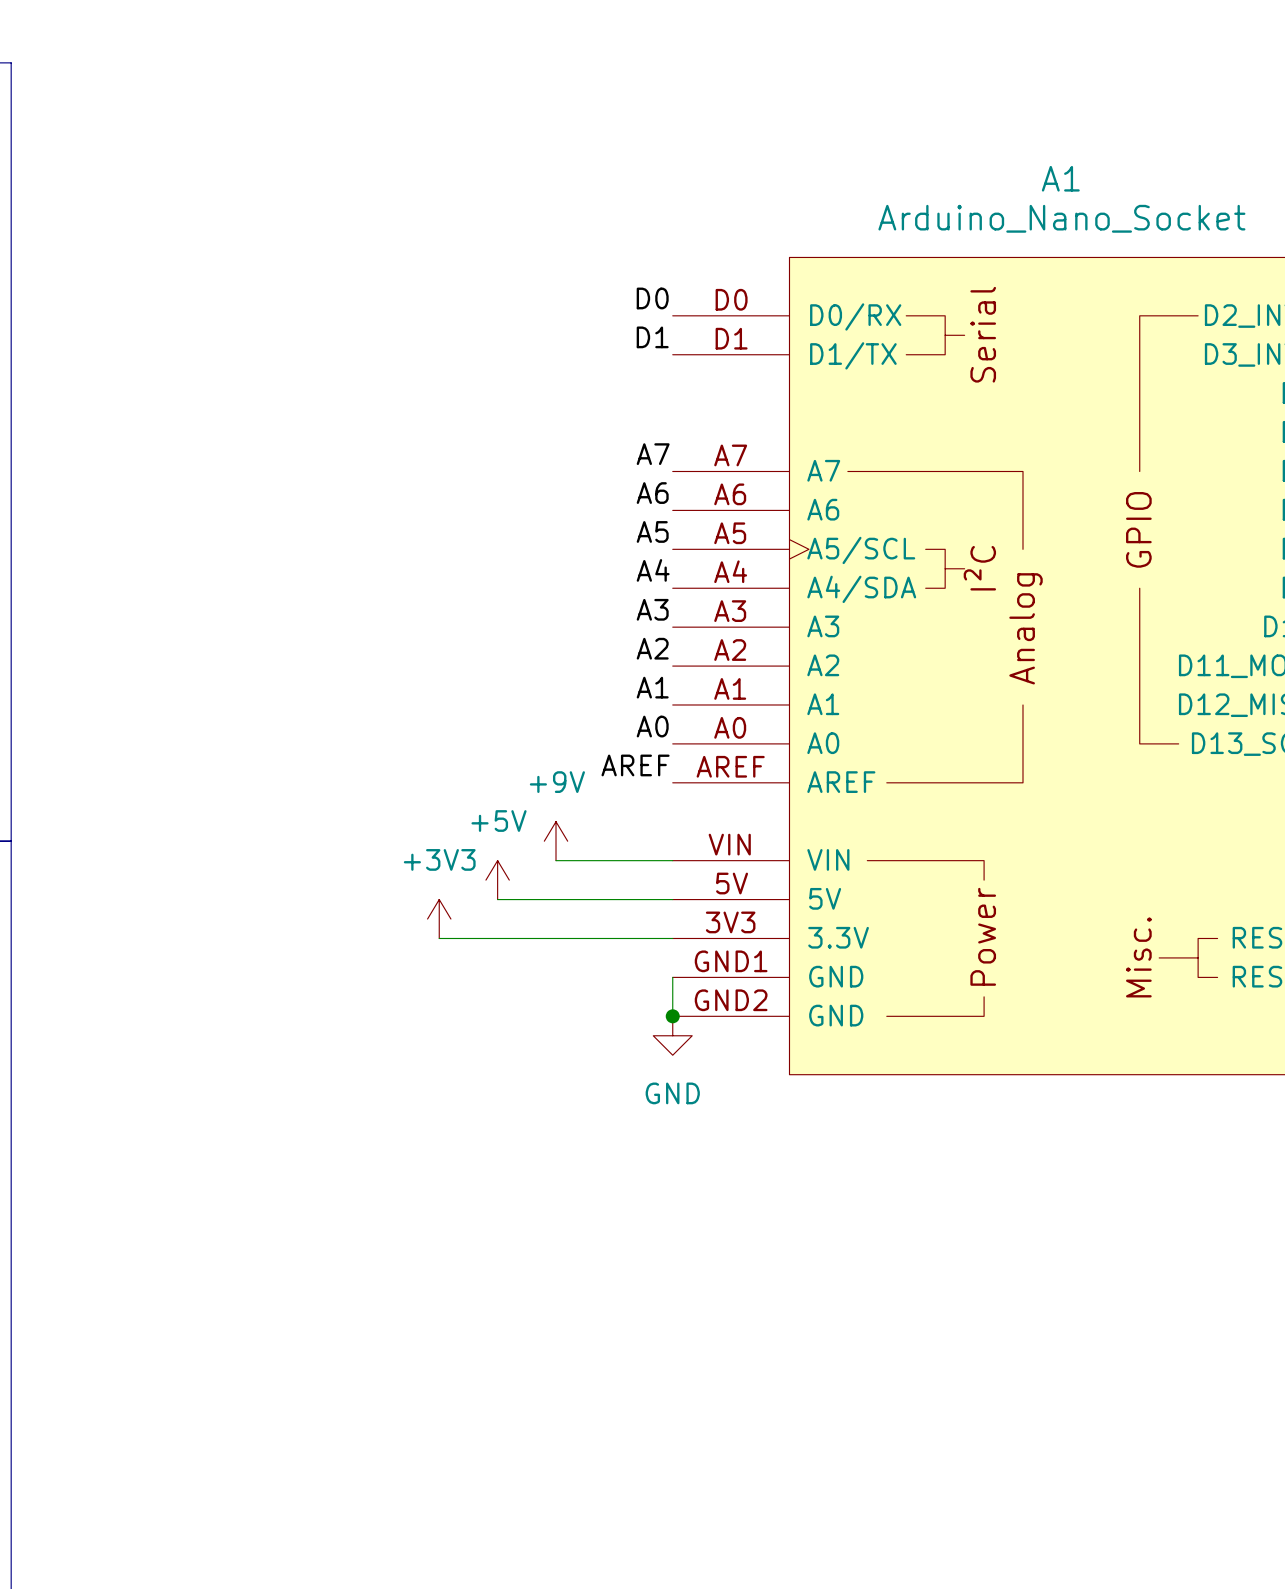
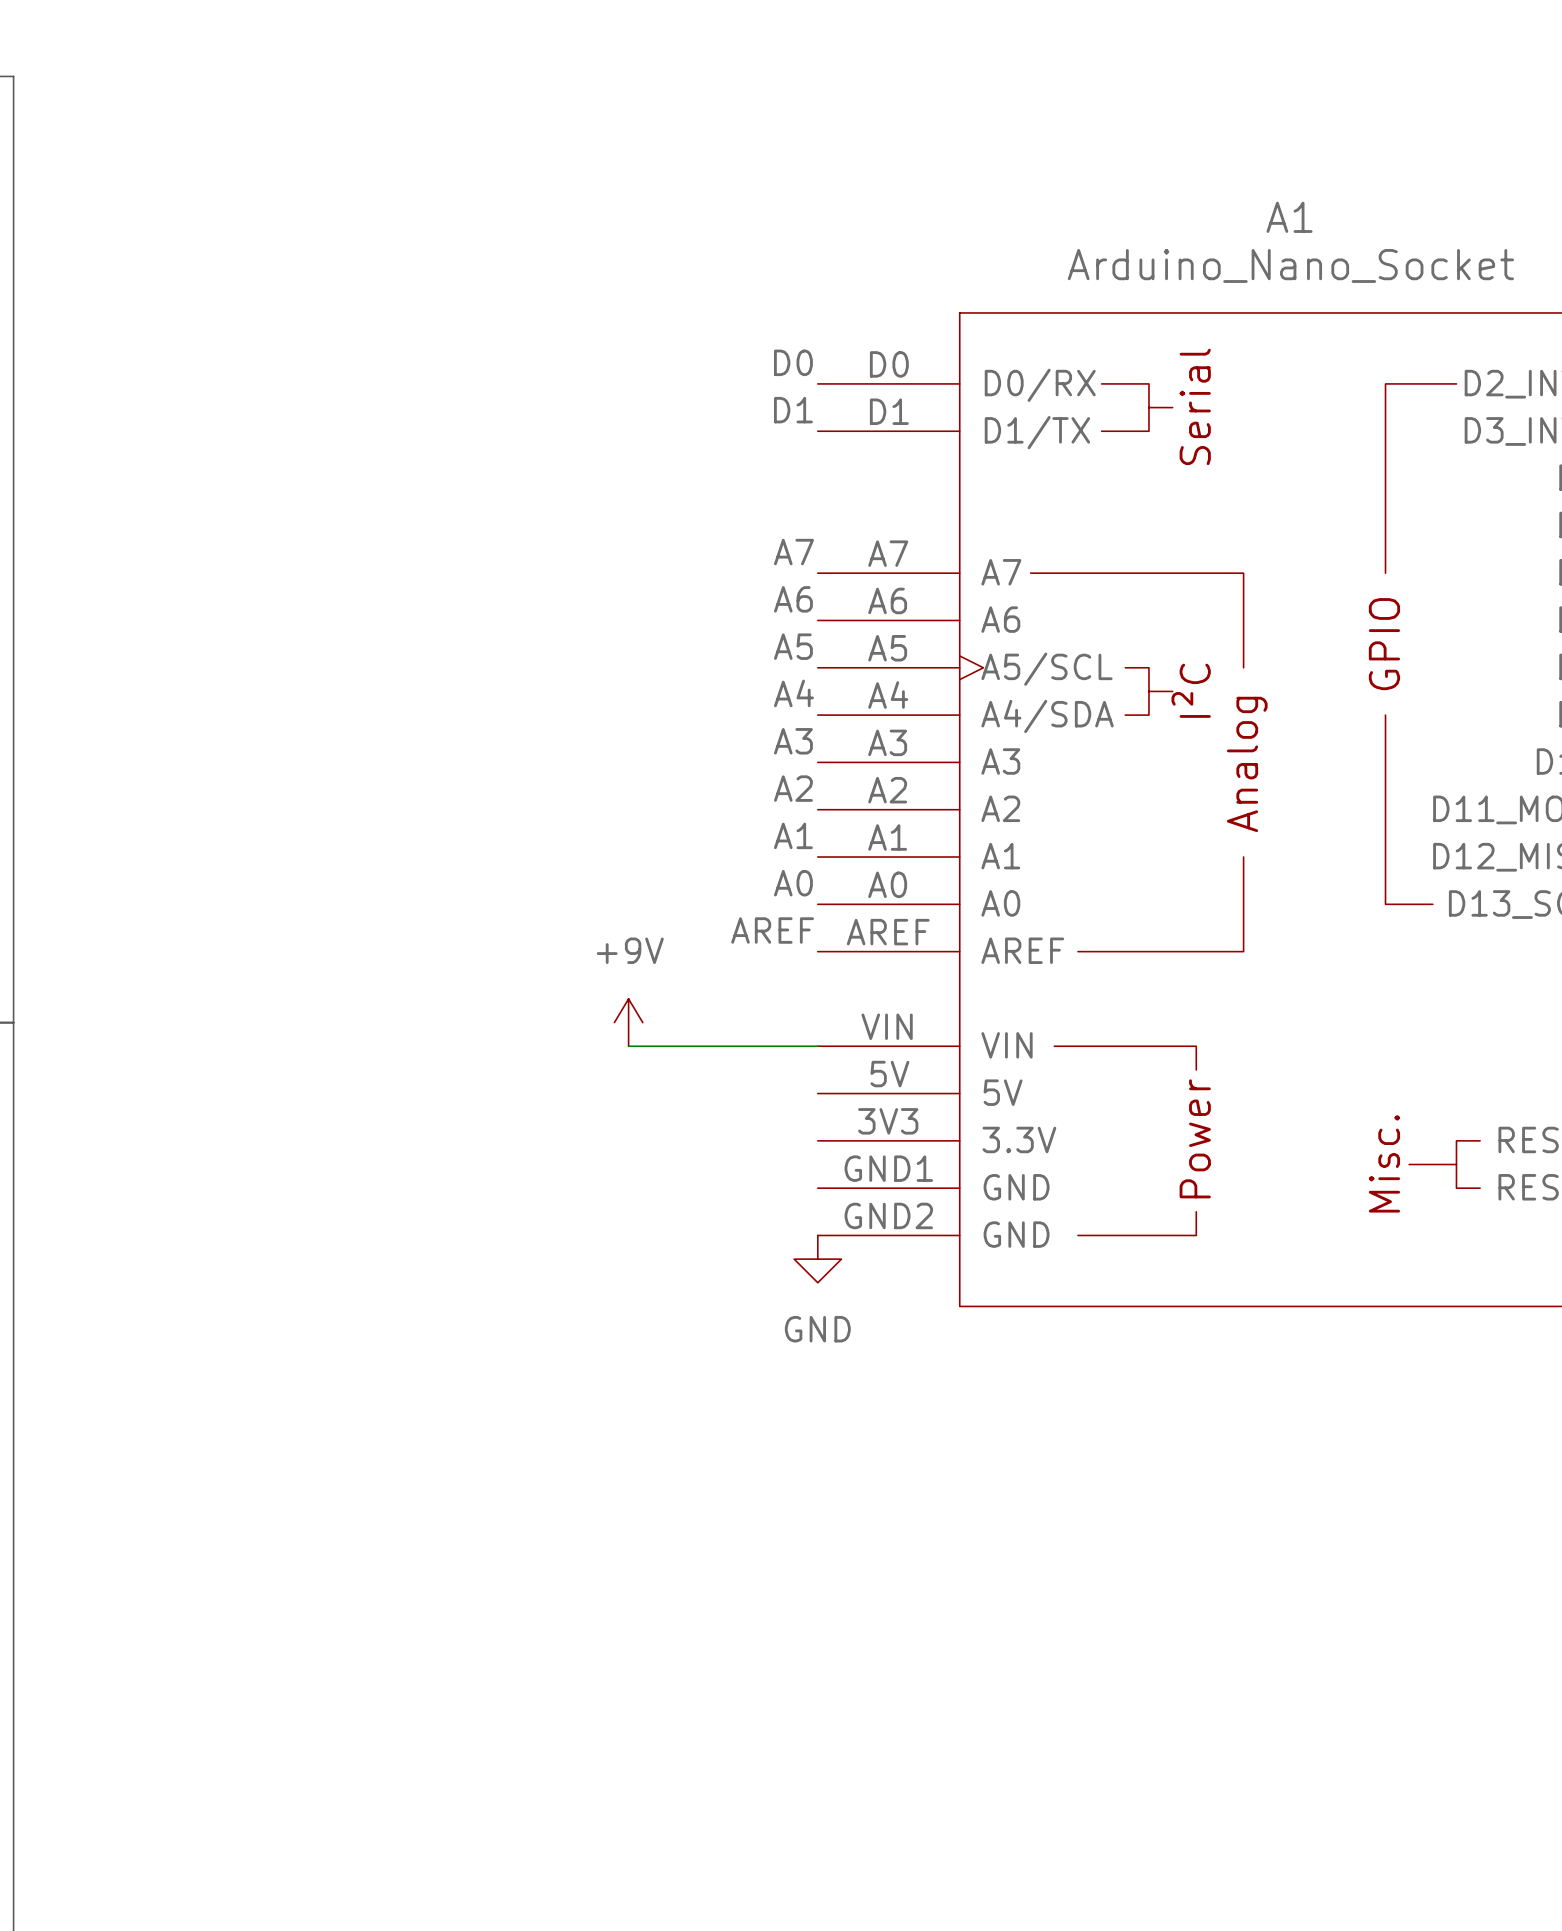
power symbol position: +9V (556, 841) -> +9V (628, 1022)
wire: none -> (628, 1046) (675, 1046)
power symbol: +5V (497, 880) -> none
wire: (497, 899) (672, 899) -> none
power symbol: +3V3 (439, 919) -> none
wire: (439, 938) (672, 938) -> none
wire: (672, 977) (672, 1016) -> none
junction: (672, 1016) -> none

